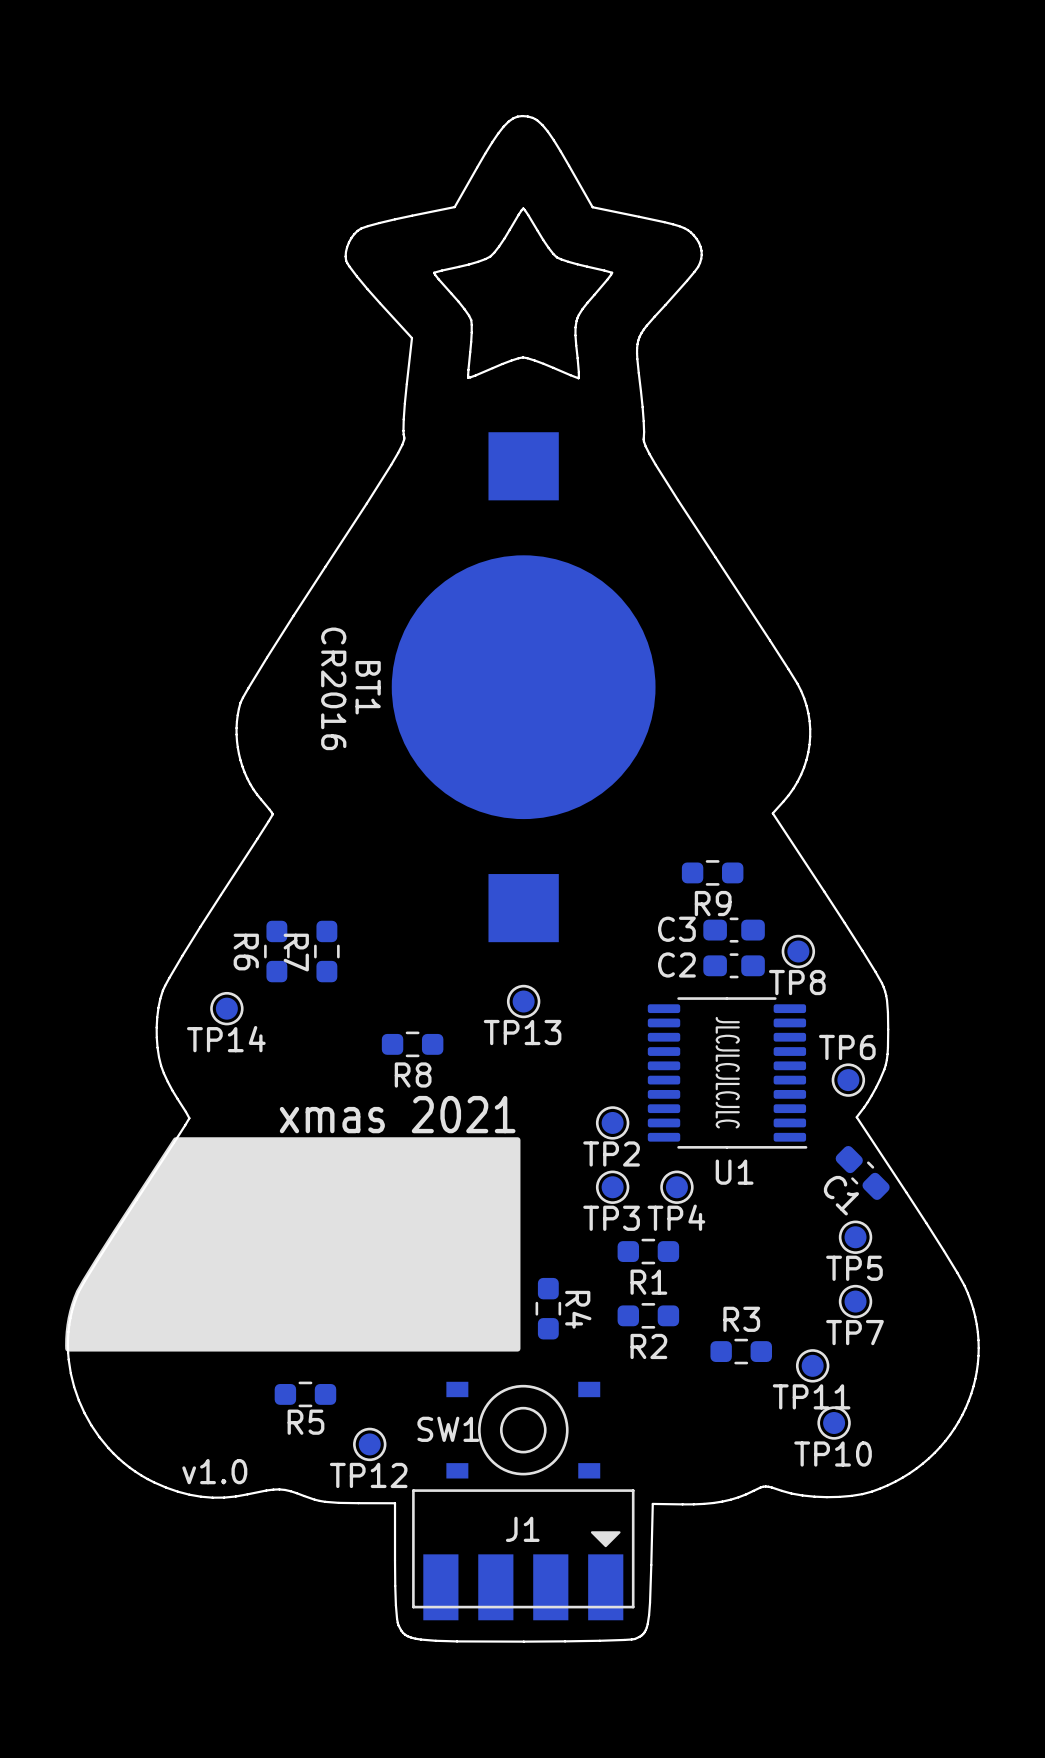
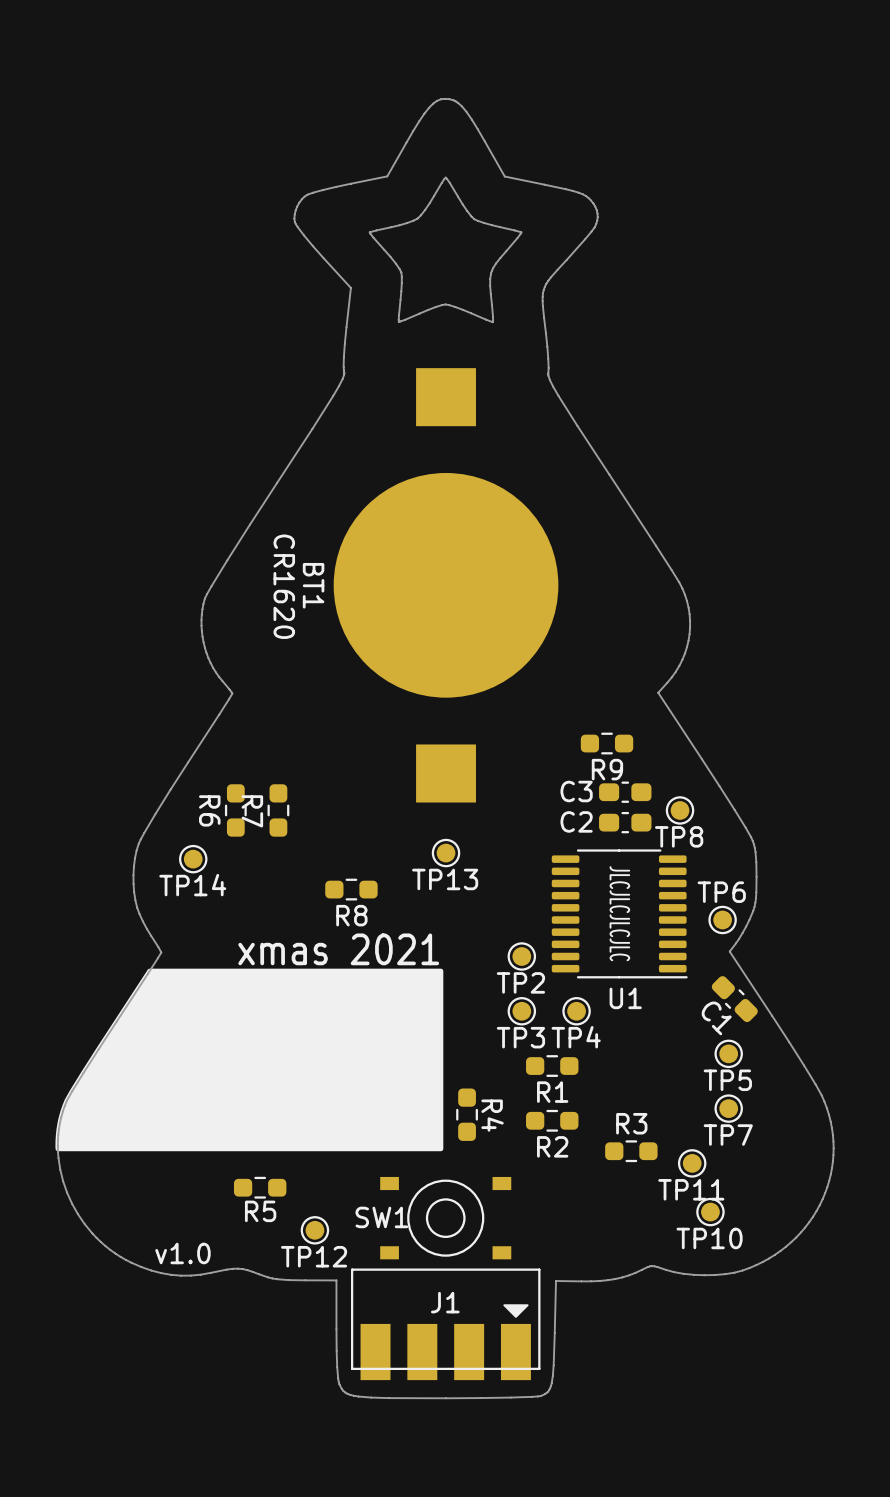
text: CR2016 (333, 688) -> CR1620 (284, 586)

